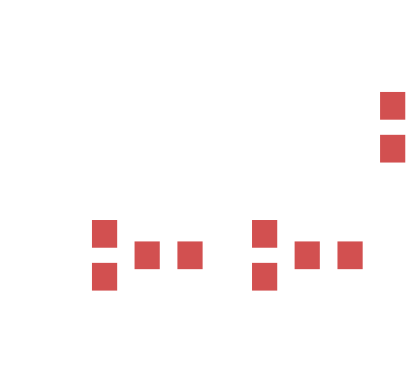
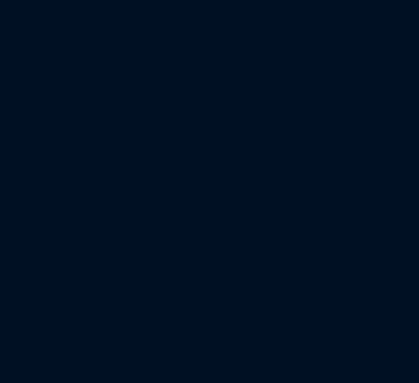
part: (392, 127) -> none
part: (104, 255) -> none
part: (168, 255) -> none
part: (264, 255) -> none
part: (328, 255) -> none

